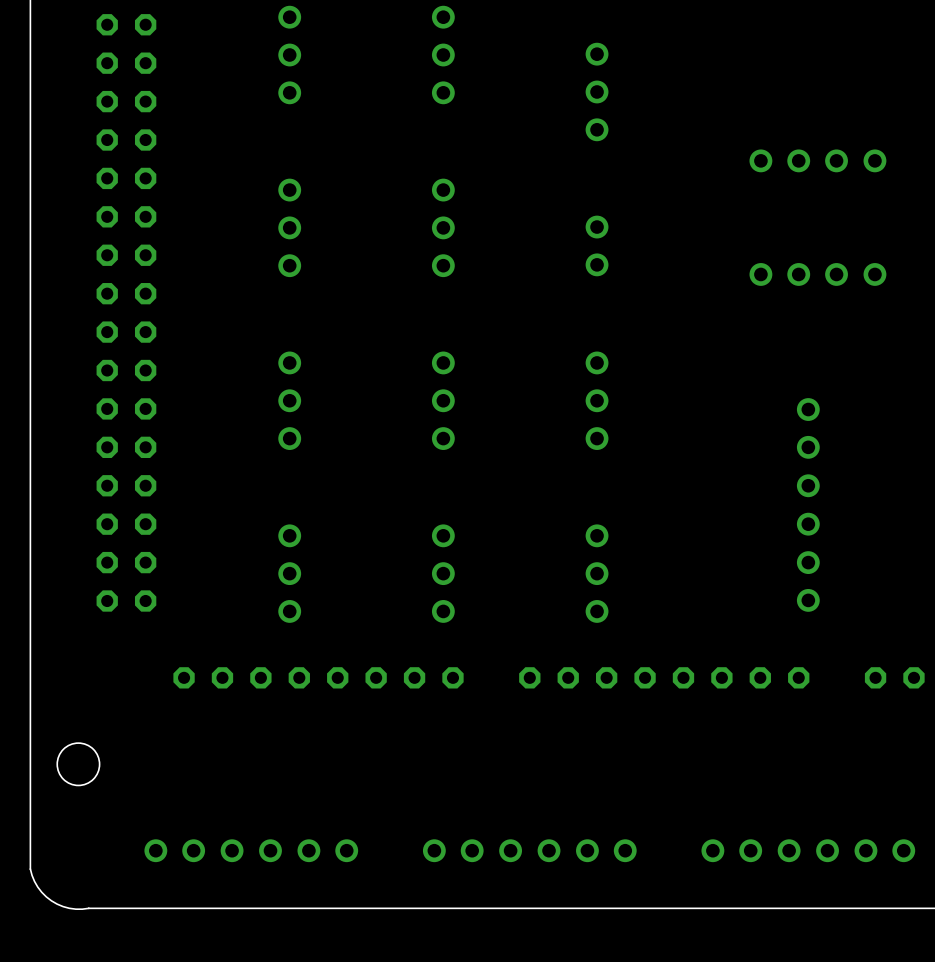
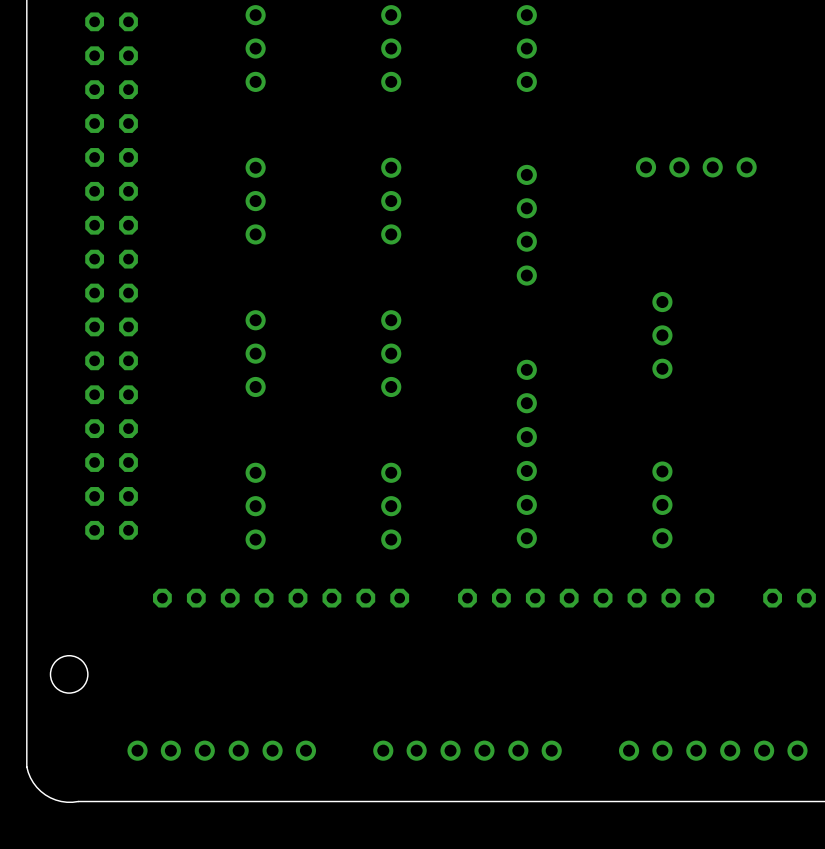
part position: (597, 91) -> (526, 48)
part position: (817, 160) -> (696, 167)
part footprint: [585, 215, 609, 277] -> [516, 164, 537, 286]
part: (817, 274) -> none
part: none -> (662, 335)
part: (597, 400) -> none
part position: (808, 504) -> (526, 454)
part: none -> (662, 504)
part: (597, 573) -> none

